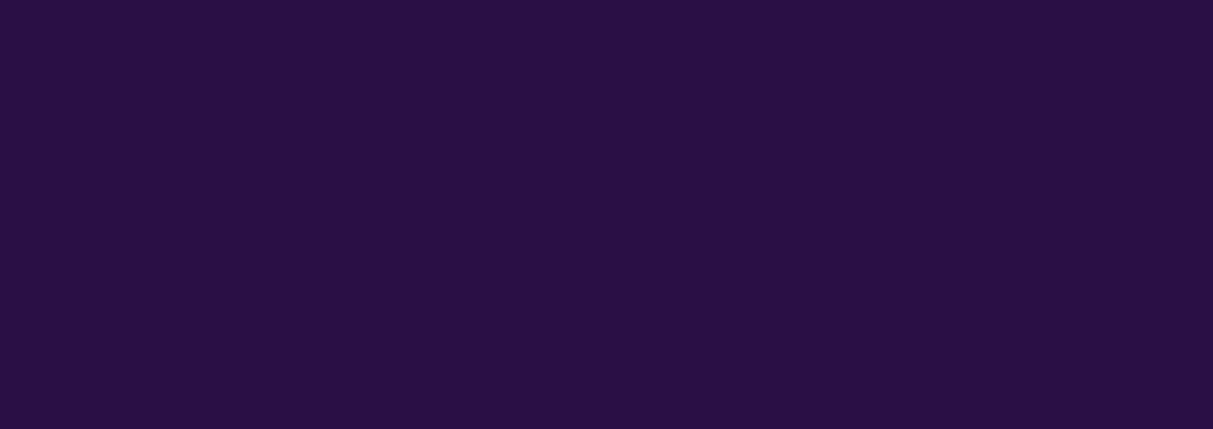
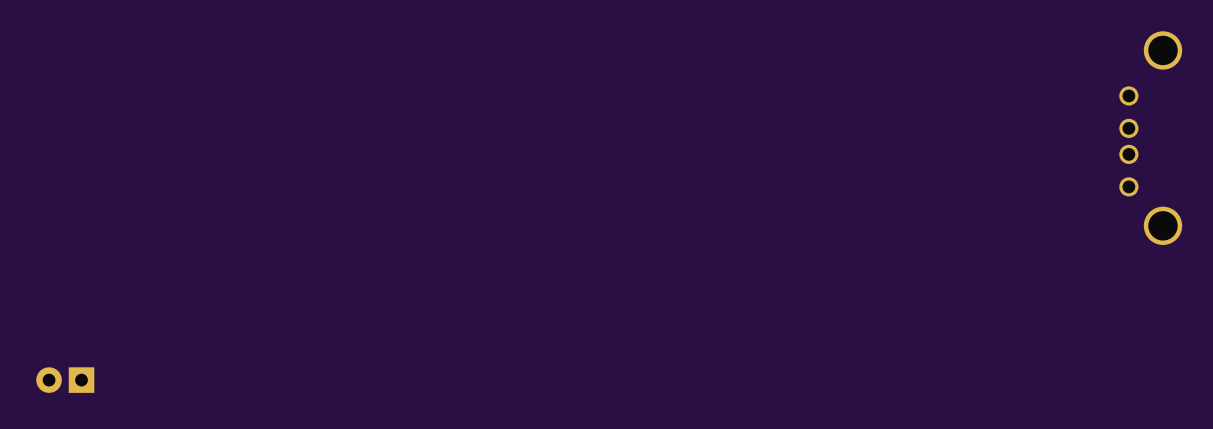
part: none -> (1150, 138)
part: none -> (65, 380)

